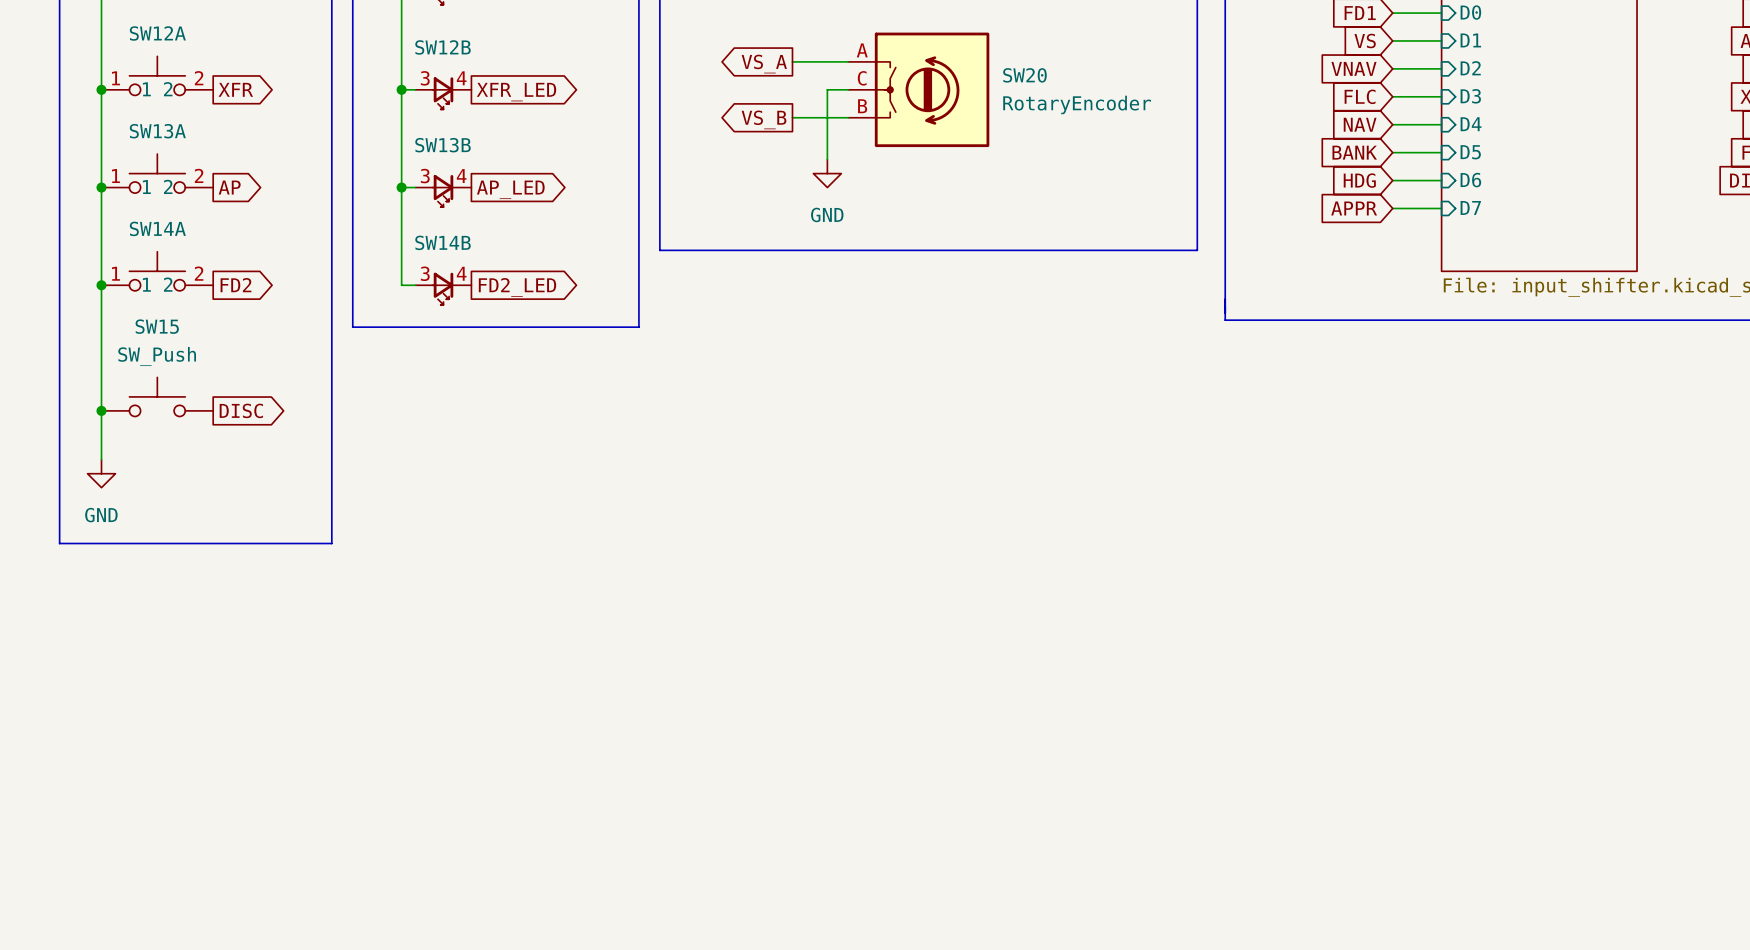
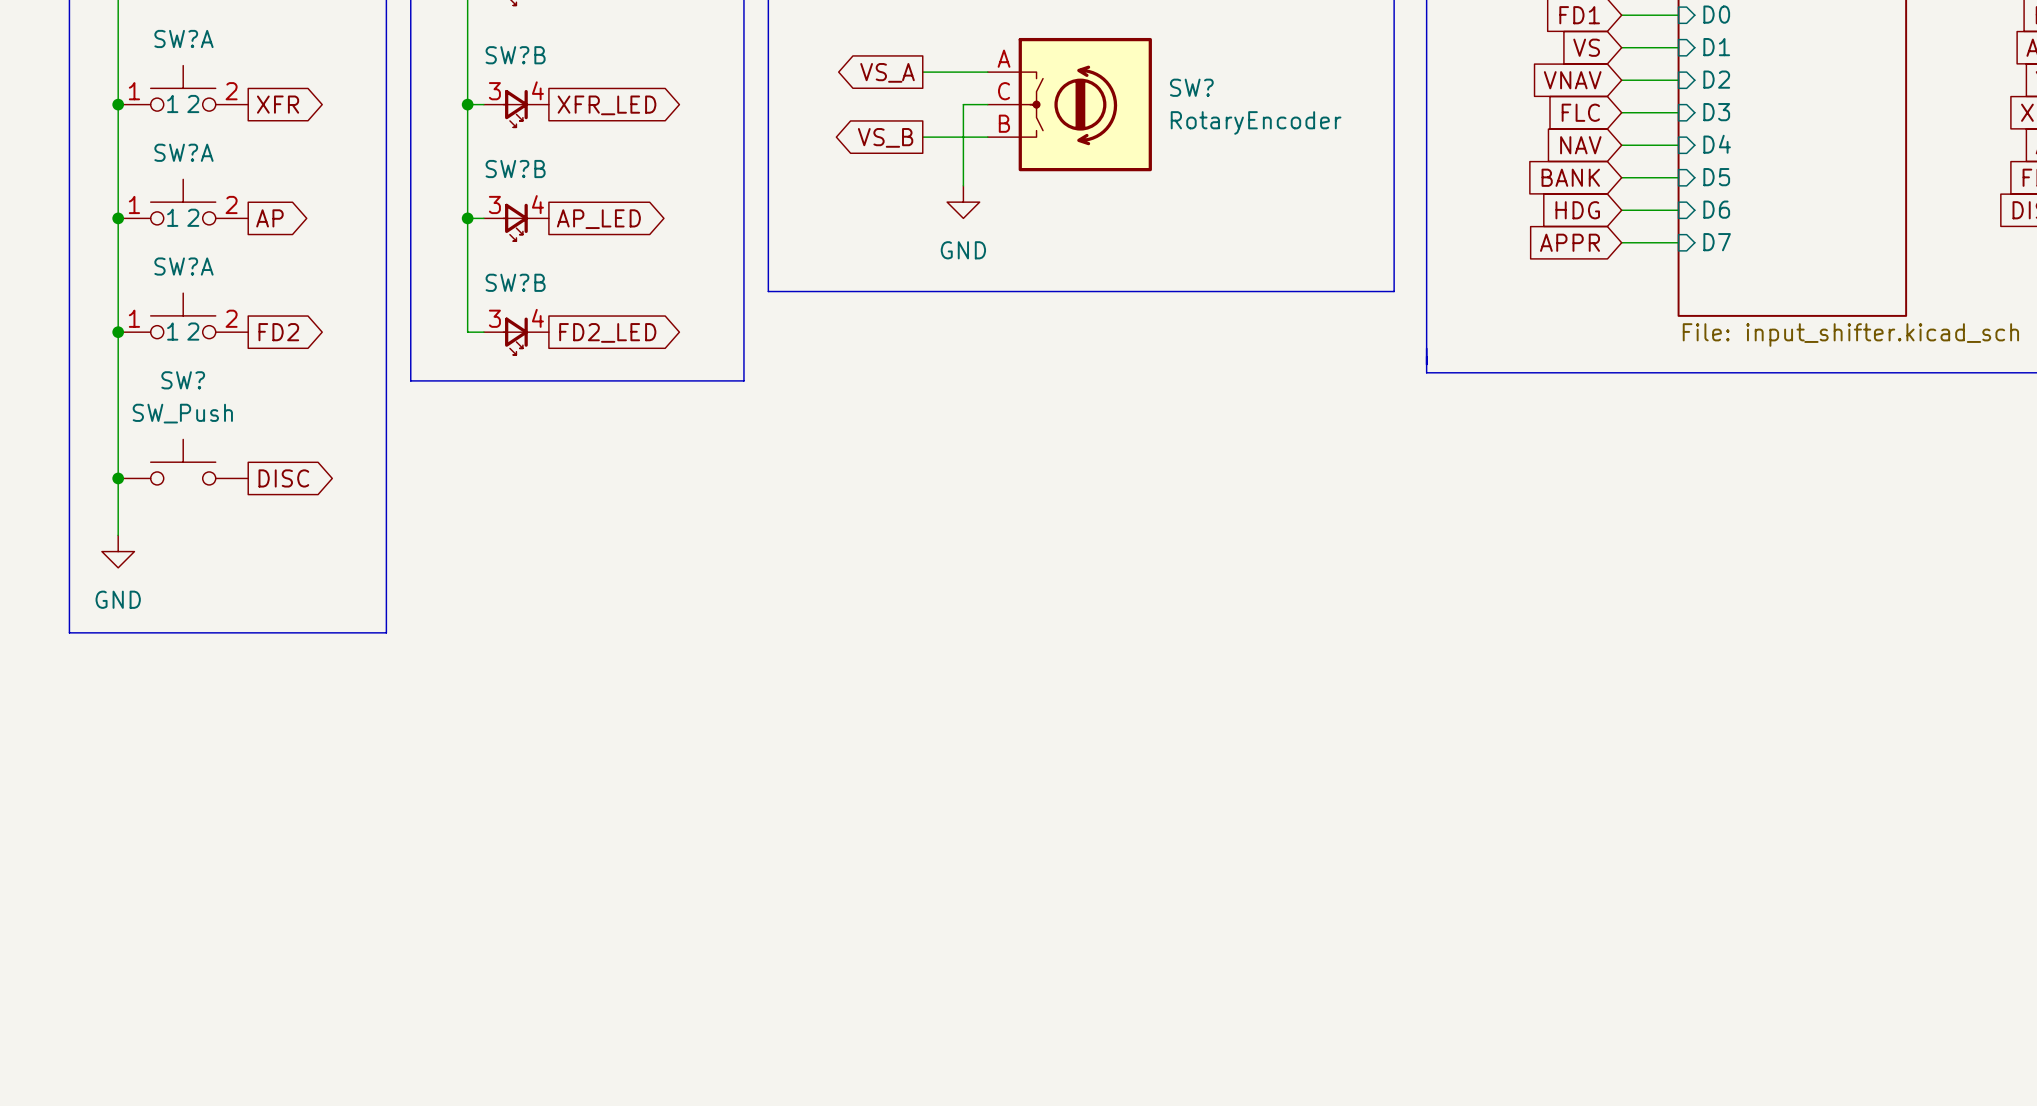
SW12A name: SW12A (157, 33) -> SW?A (183, 38)
SW12B name: SW12B (443, 47) -> SW?B (515, 55)
SW20 name: SW20 (1024, 75) -> SW? (1191, 87)
SW13A name: SW13A (157, 131) -> SW?A (183, 152)
SW13B name: SW13B (443, 145) -> SW?B (515, 169)
SW14A name: SW14A (157, 228) -> SW?A (183, 266)
SW14B name: SW14B (443, 242) -> SW?B (515, 282)
SW15 name: SW15 (157, 326) -> SW? (183, 380)

